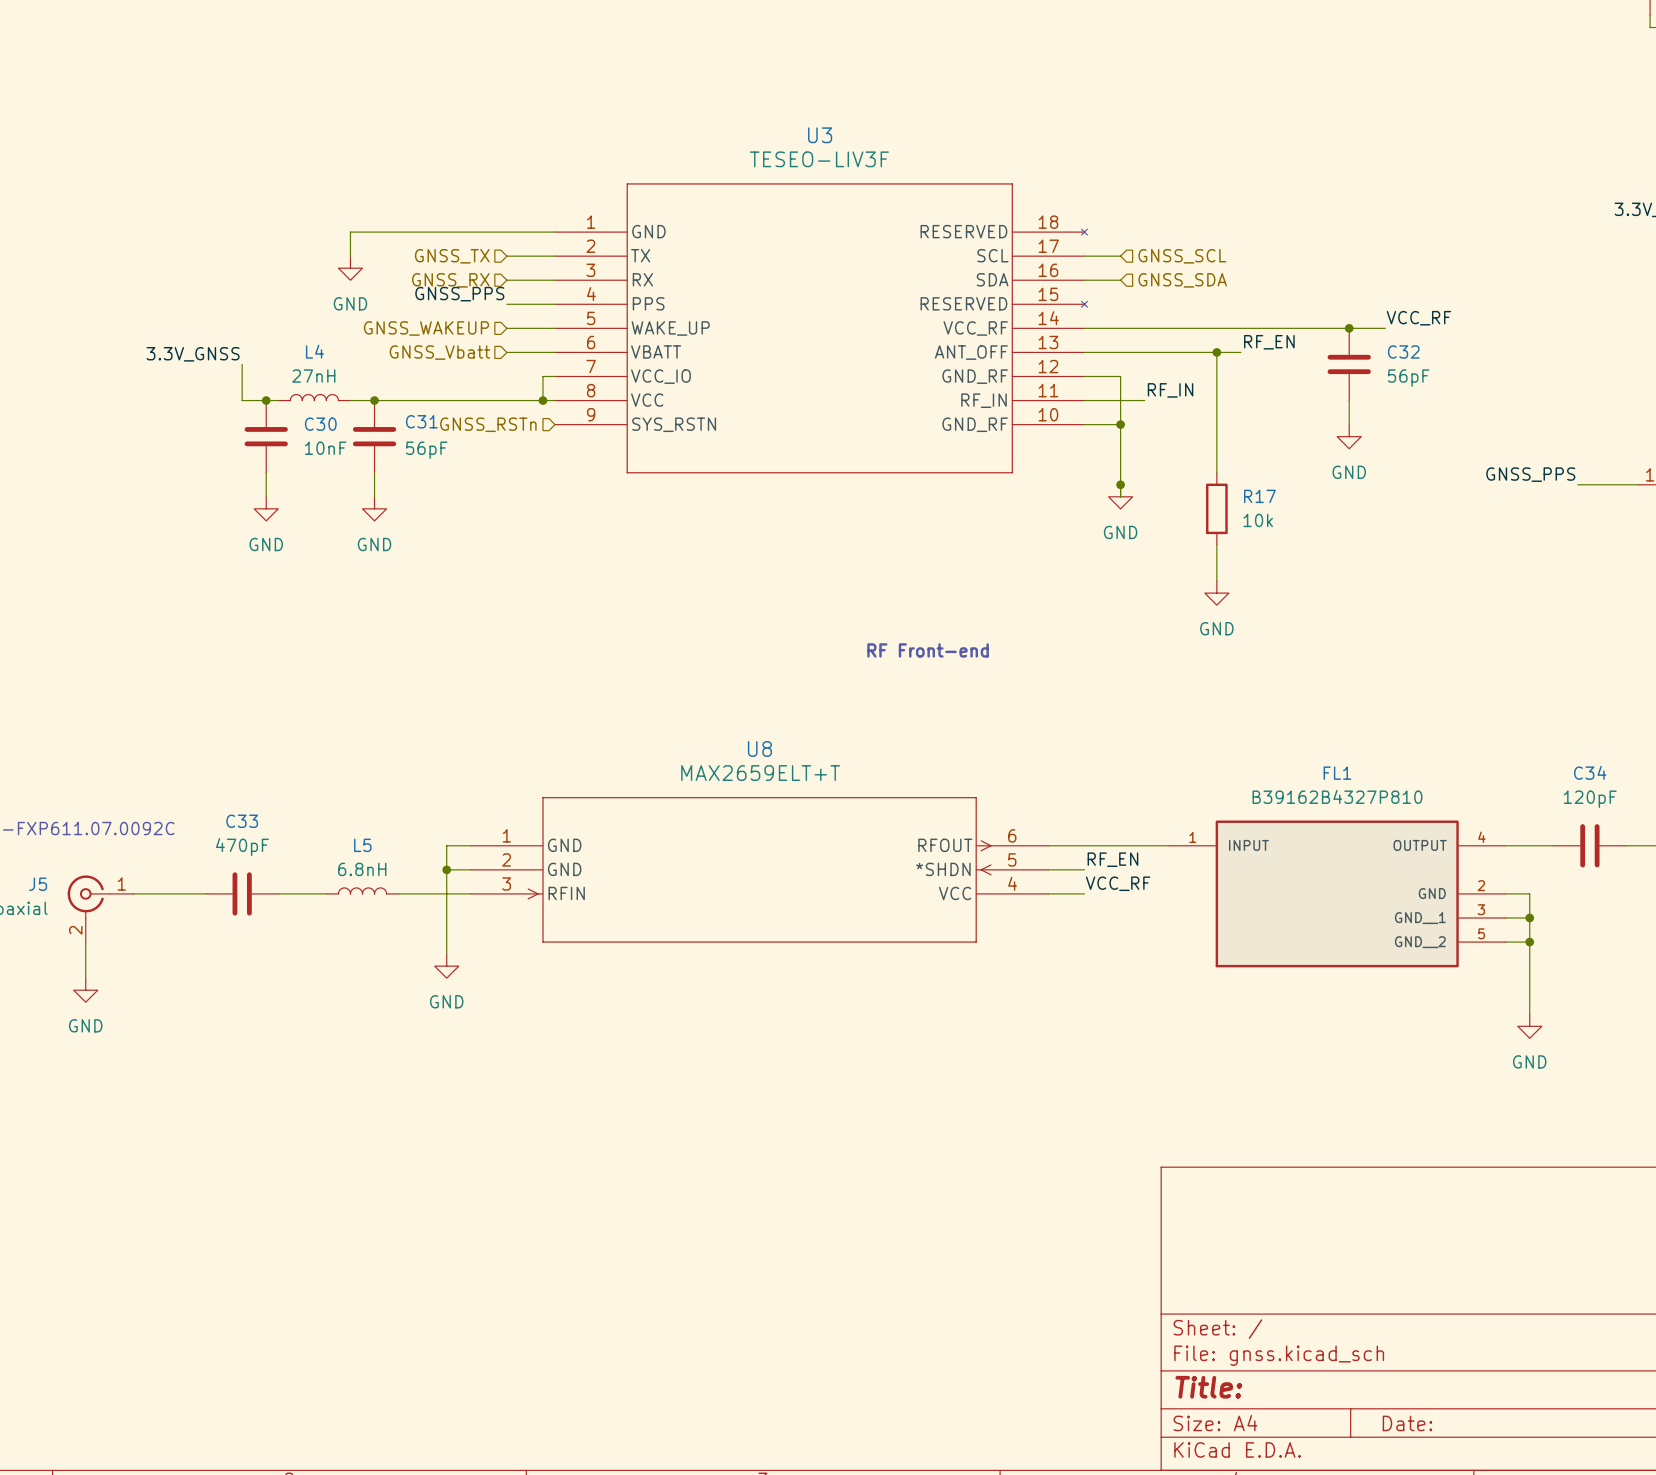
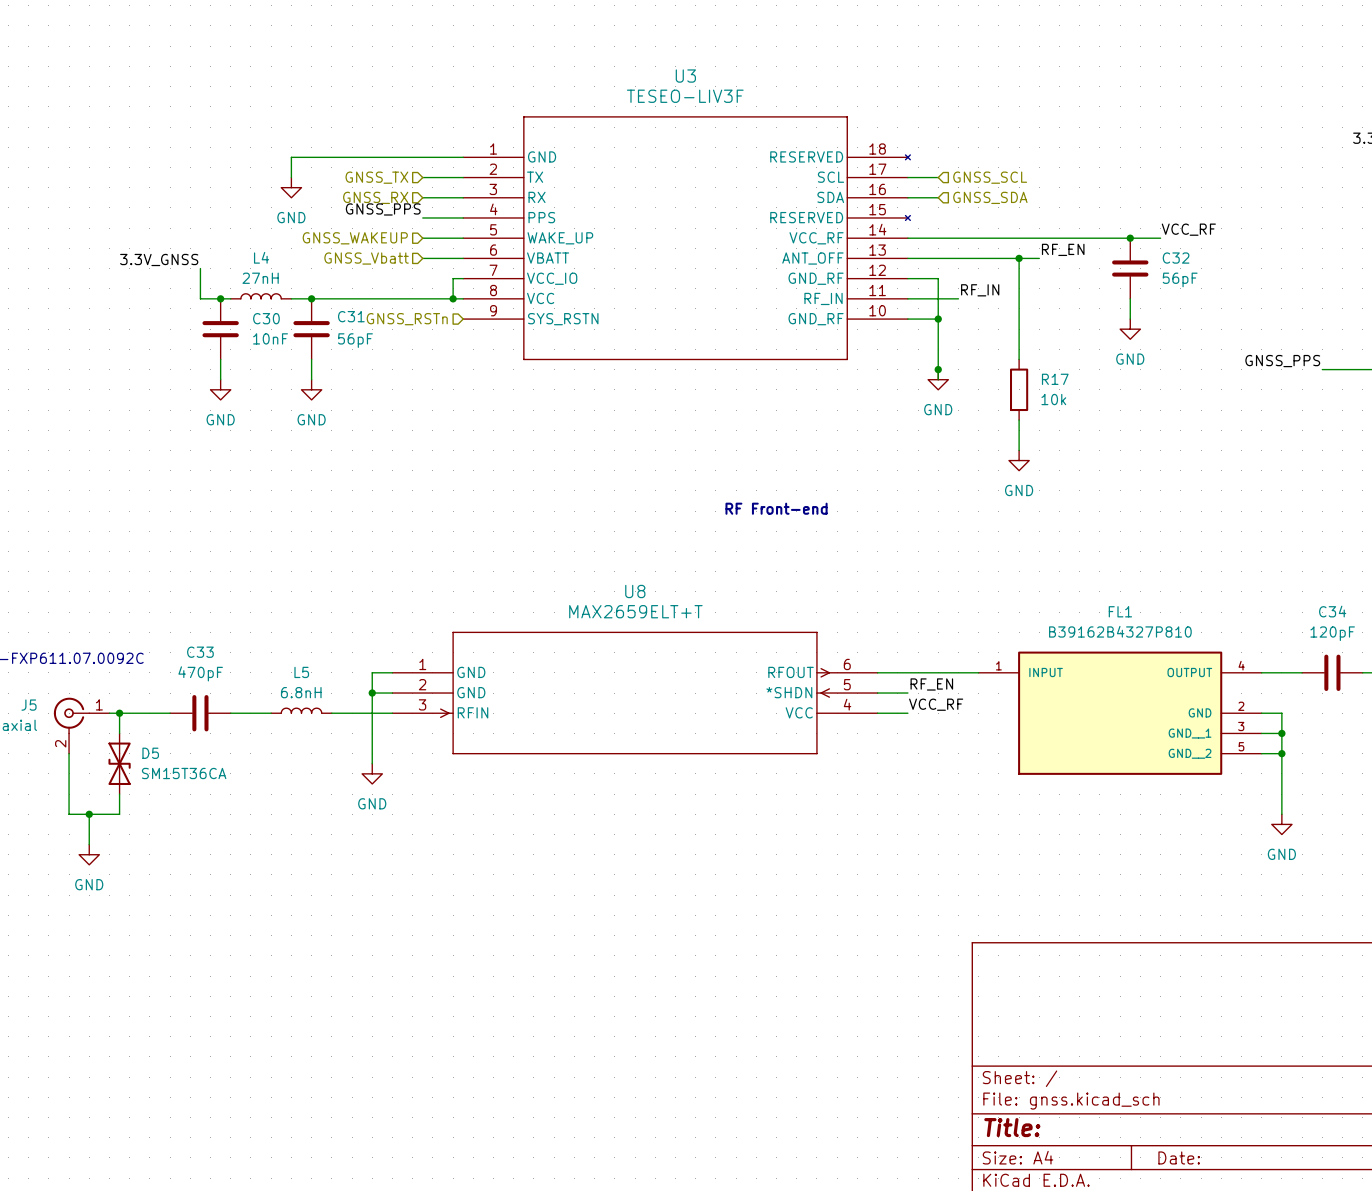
wire: none -> (119, 713) (119, 733)
junction: none -> (119, 713)
D5: none -> SM15T36CA (119, 763)
wire: none -> (69, 783) (69, 814) (119, 814) (119, 794)
power symbol position: GND (85, 990) -> GND (89, 854)
wire: none -> (89, 814) (89, 844)
junction: none -> (89, 814)

